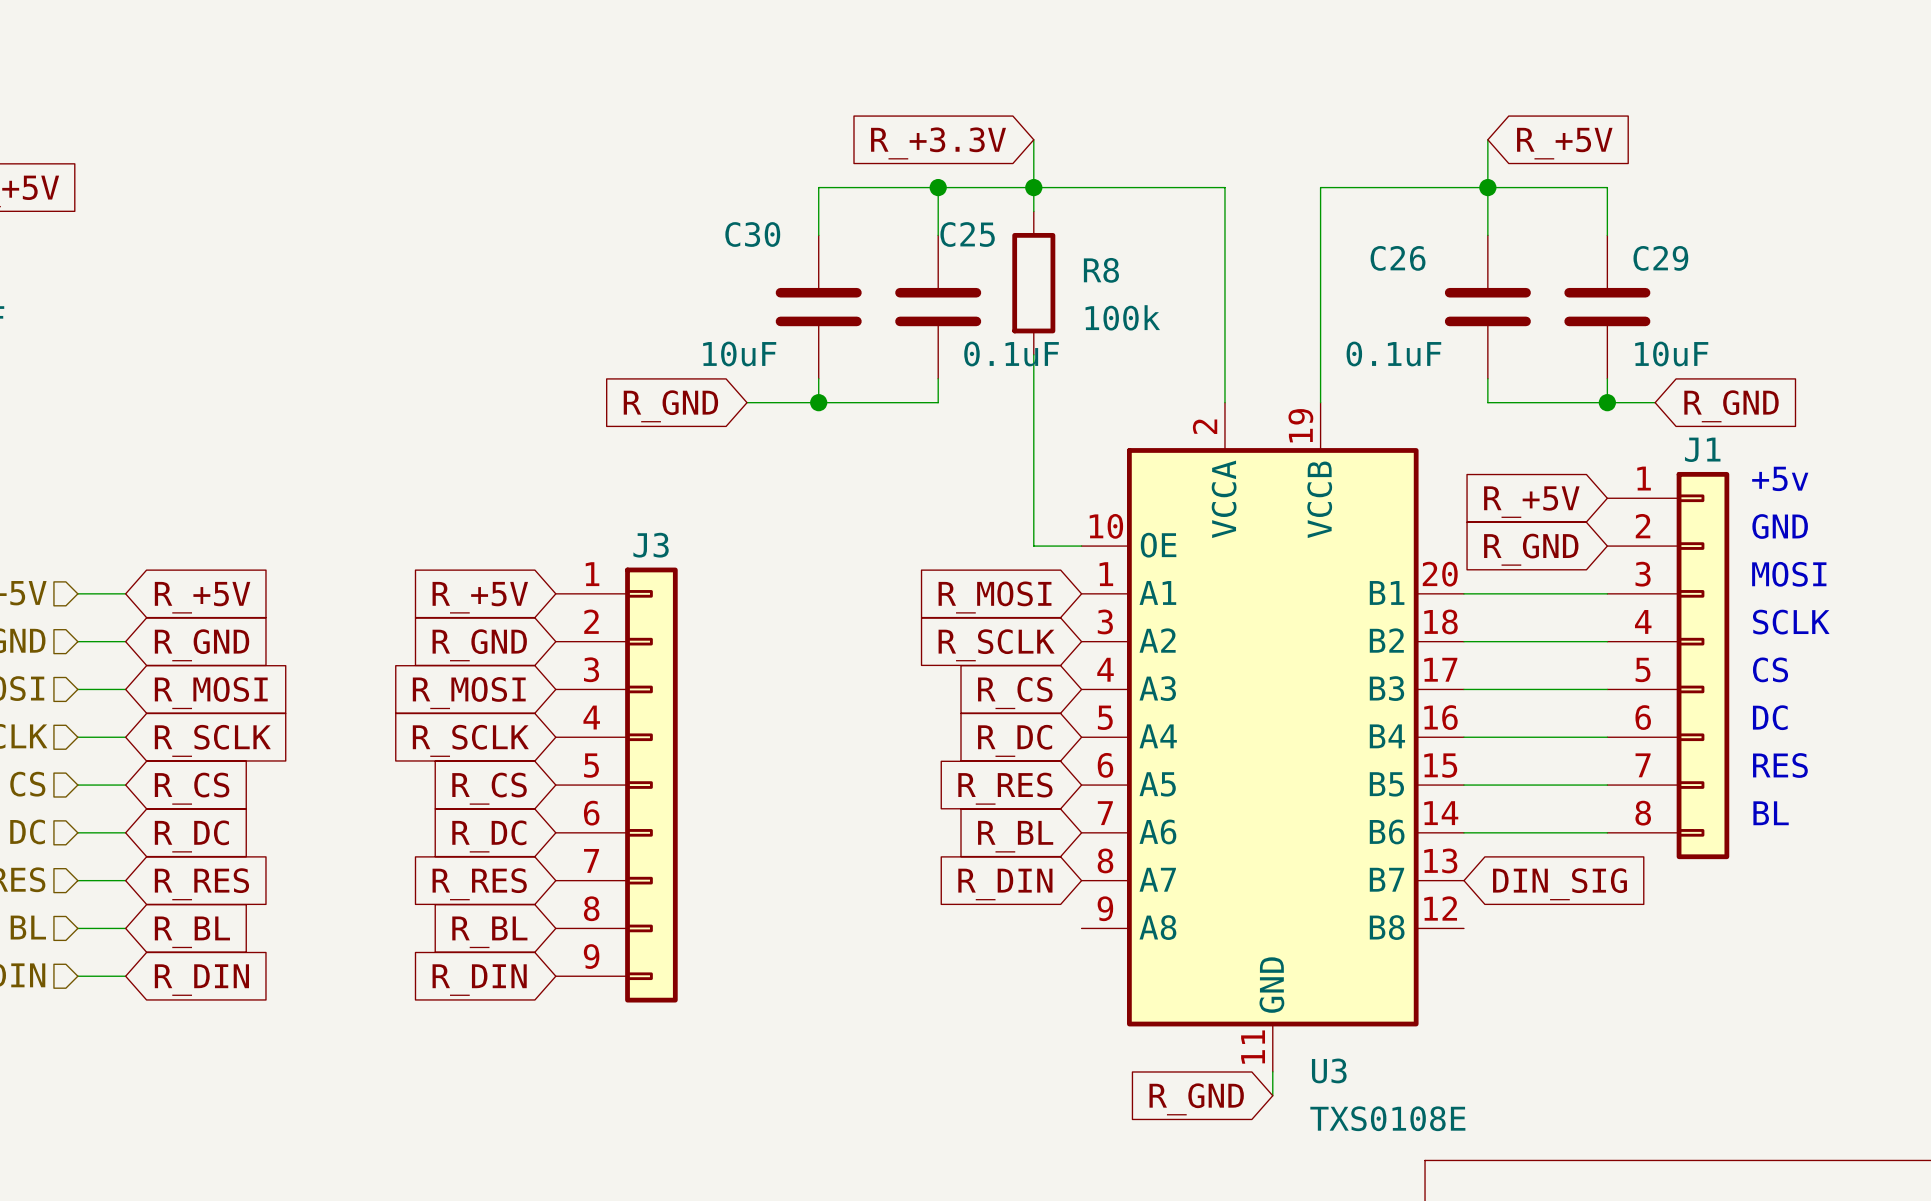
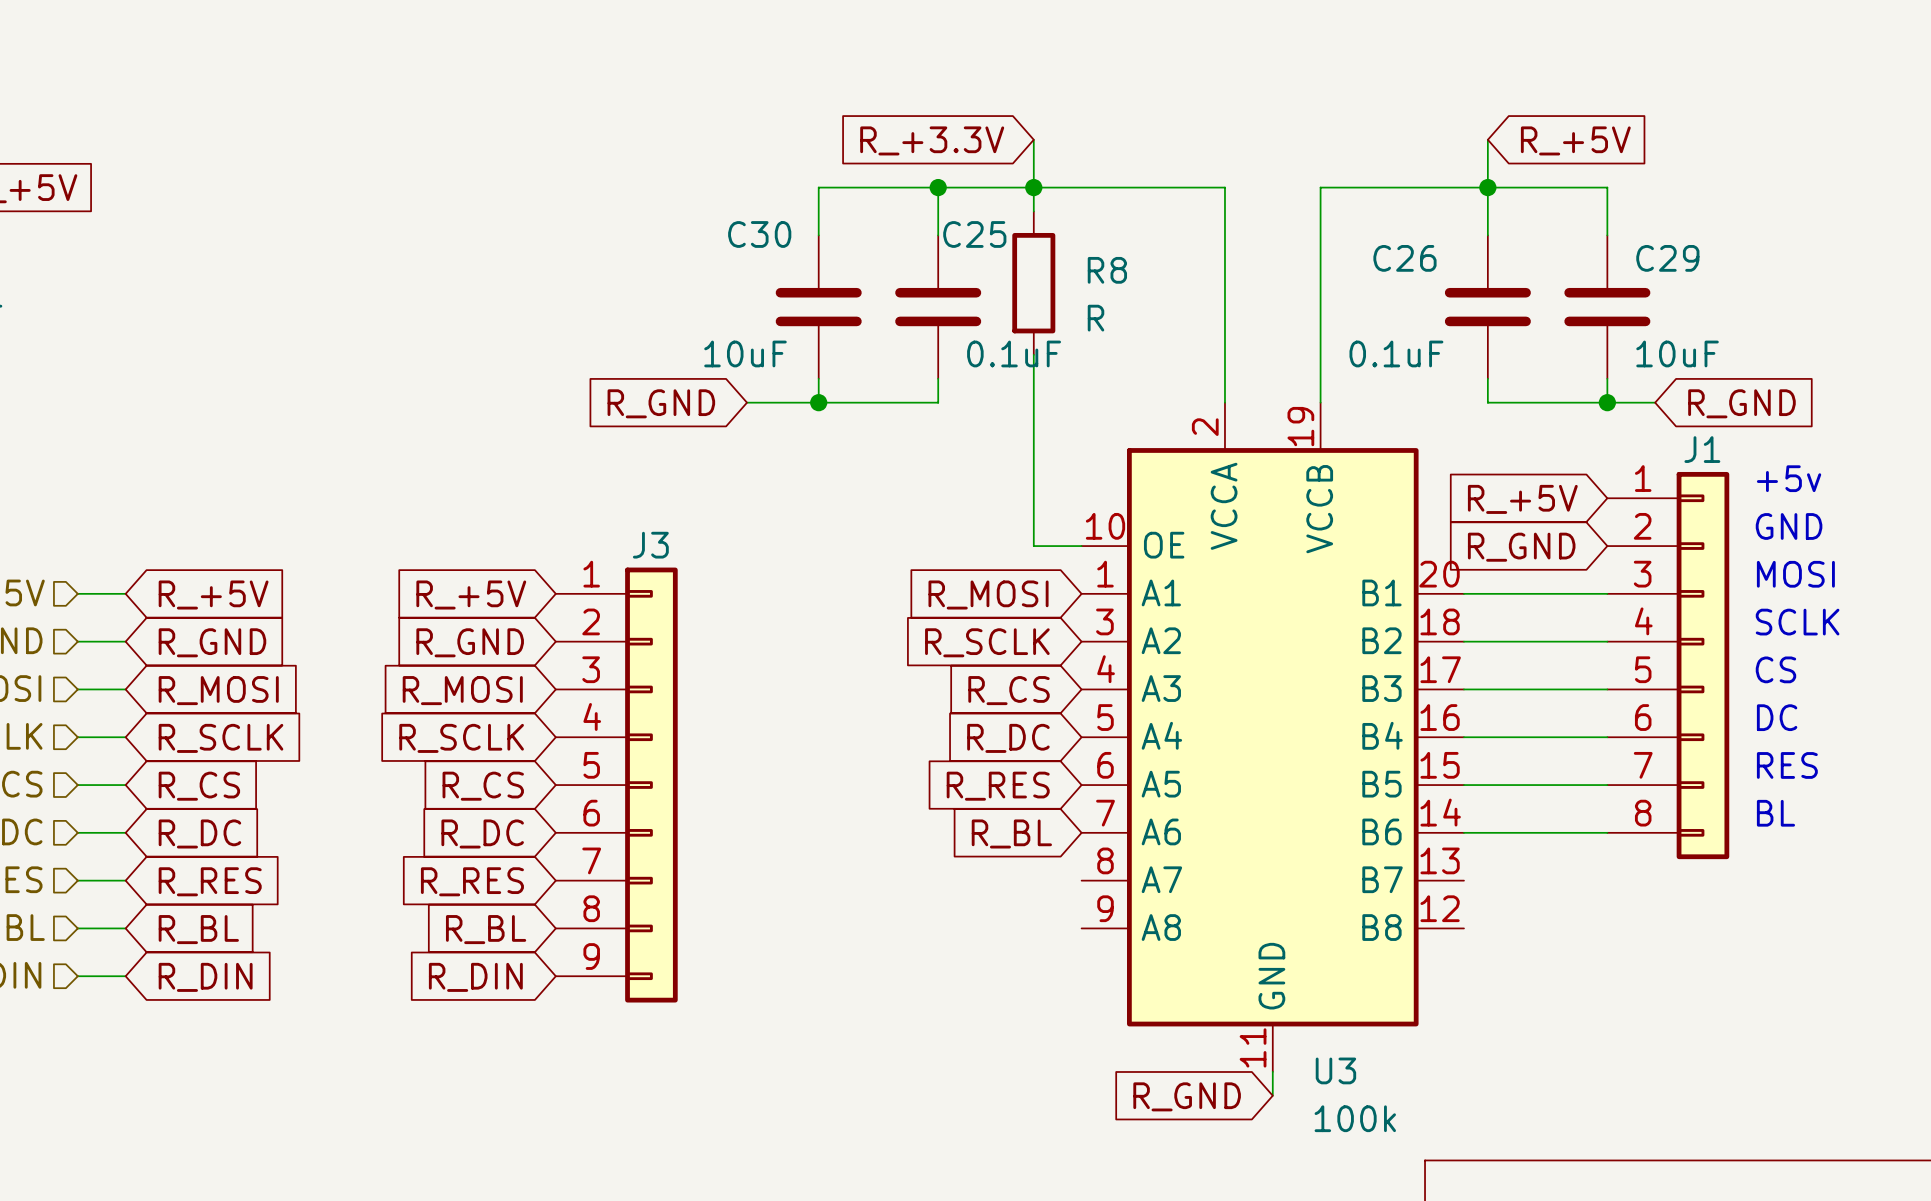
R8 value: 100k (1122, 317) -> R (1096, 318)
global label: R_DIN (1005, 884) -> none
global label: DIN_SIG (1559, 884) -> none
U3 value: TXS0108E (1387, 1118) -> 100k (1355, 1118)

